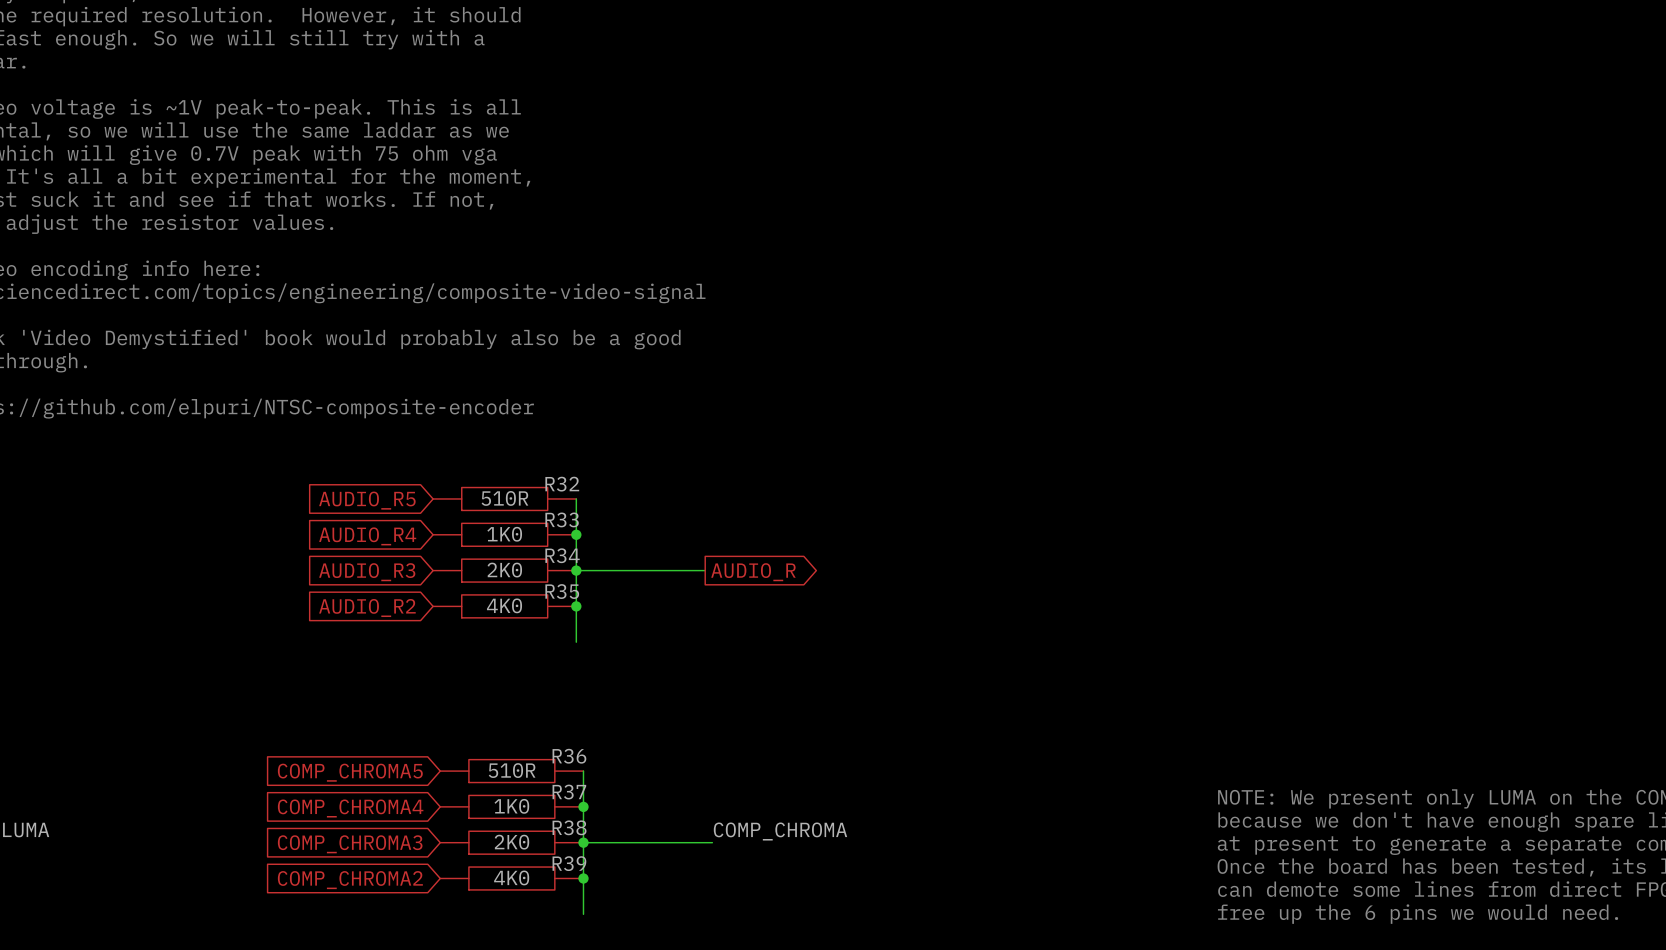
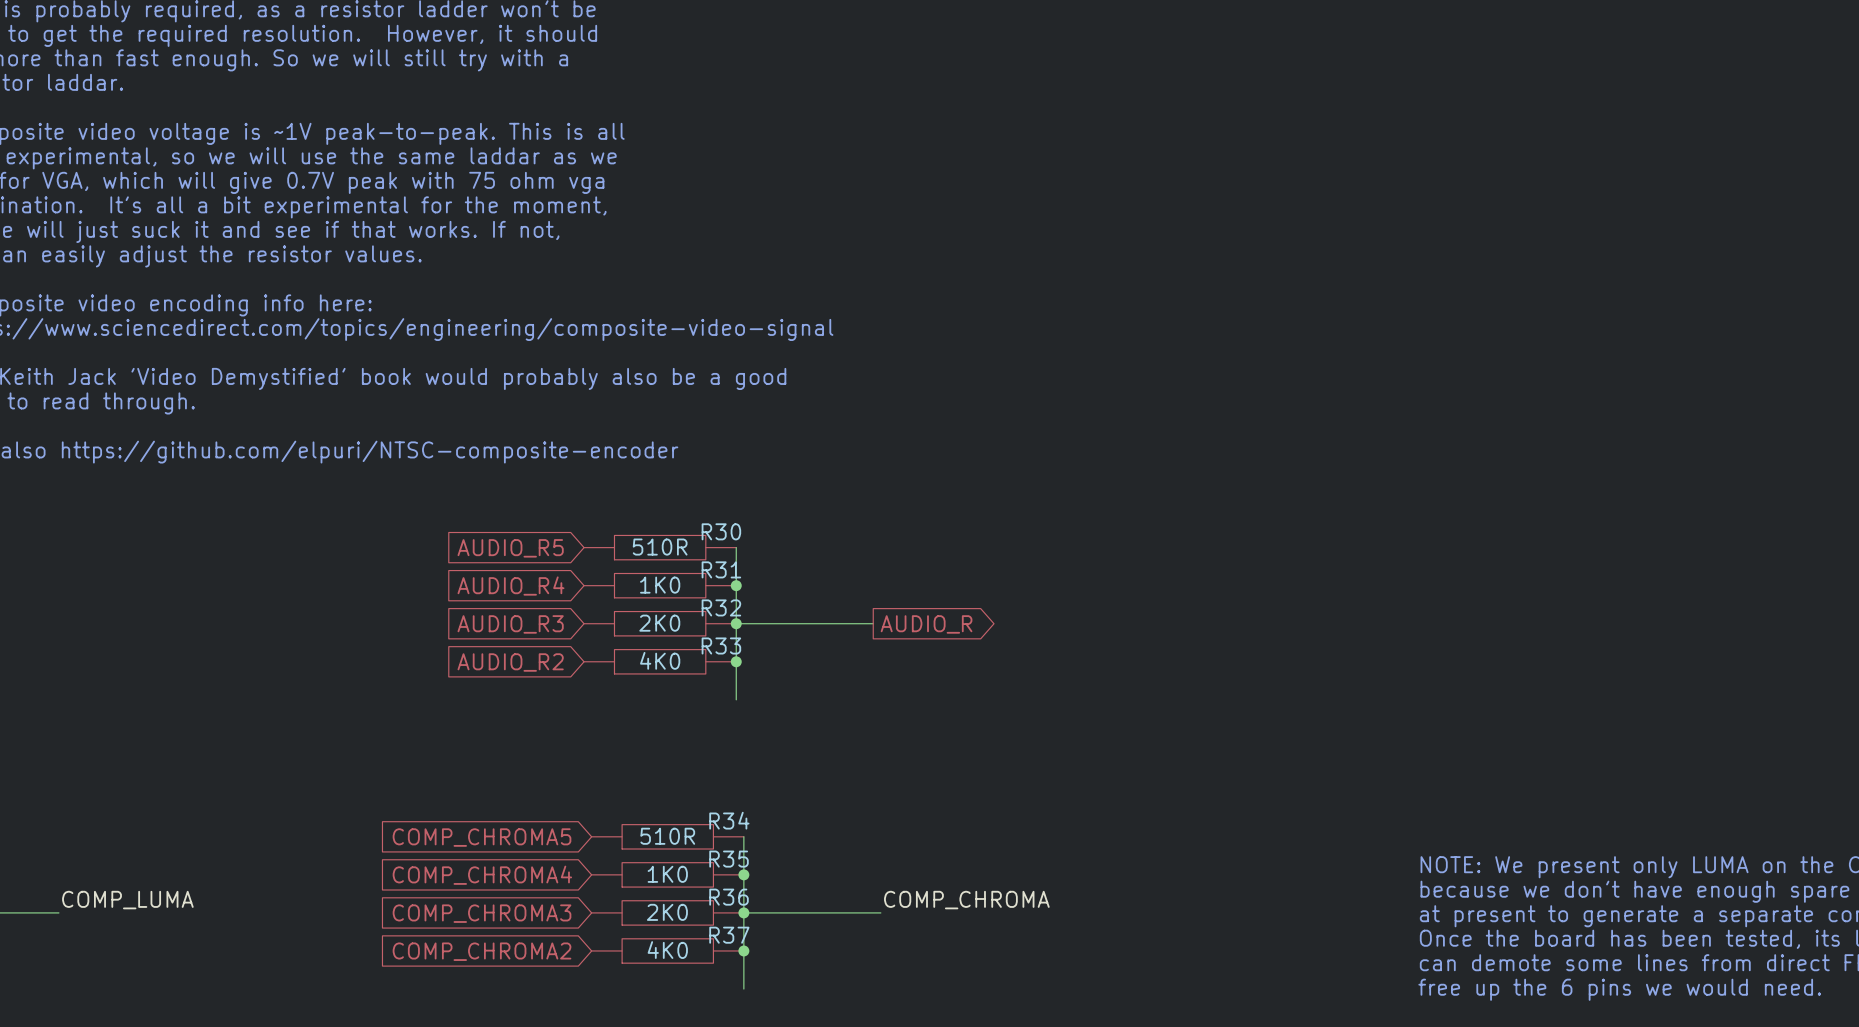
R32 name: R32 (562, 484) -> R30 (721, 531)
R33 name: R33 (562, 519) -> R31 (721, 569)
R34 name: R34 (562, 555) -> R32 (721, 607)
R35 name: R35 (562, 591) -> R33 (721, 645)
R36 name: R36 (569, 756) -> R34 (729, 820)
R37 name: R37 (569, 792) -> R35 (729, 859)
R38 name: R38 (569, 827) -> R36 (729, 897)
R39 name: R39 (569, 863) -> R37 (729, 935)

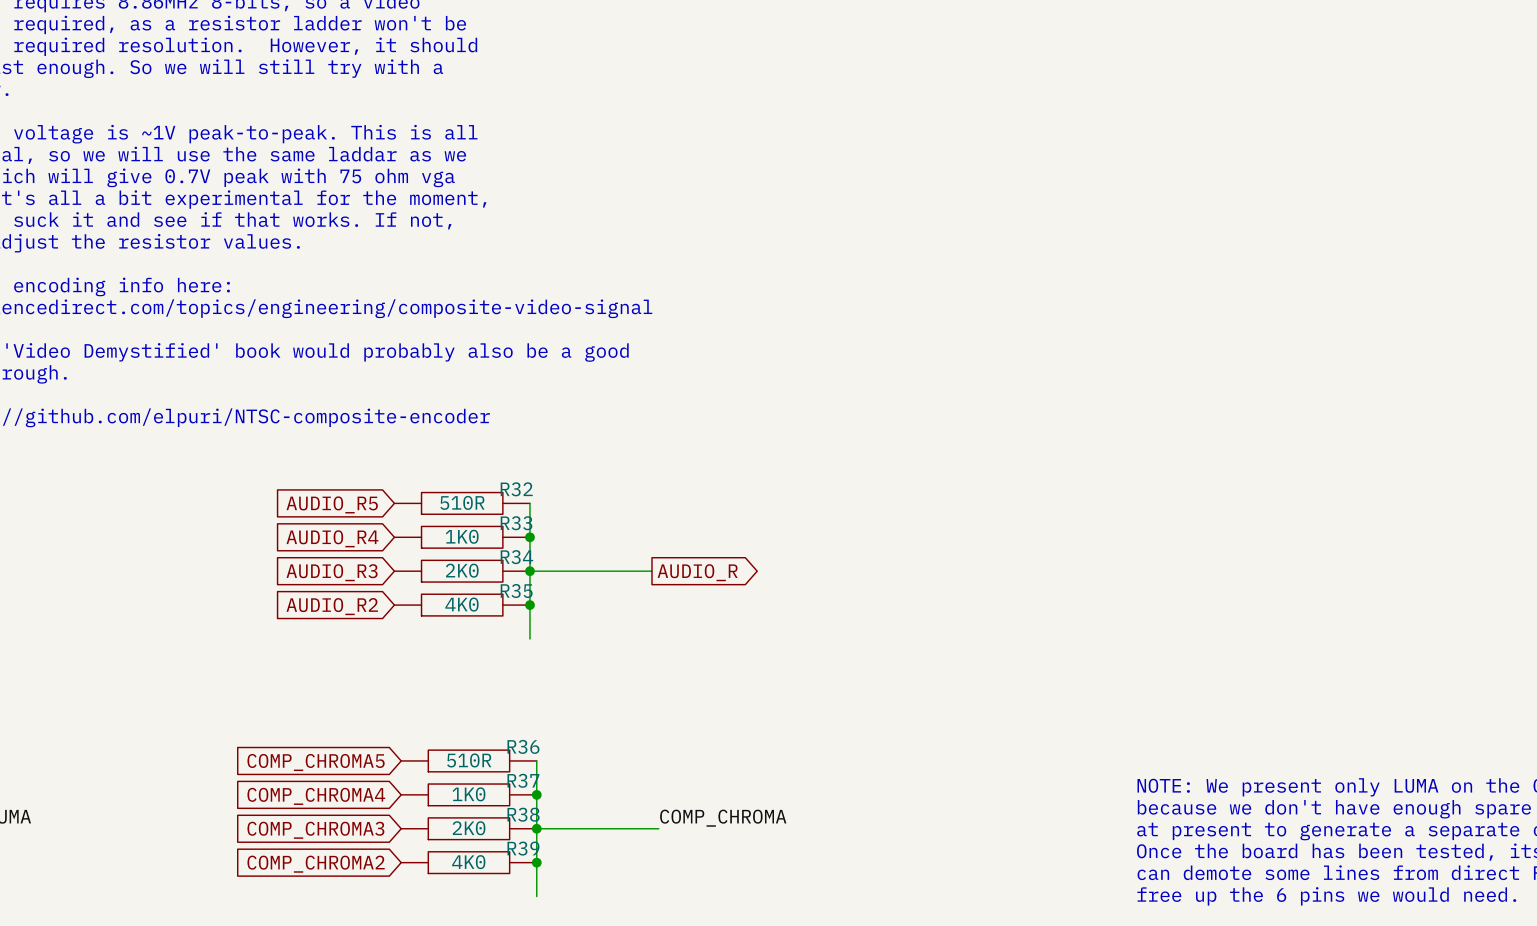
R30 name: R30 (721, 531) -> R32 (516, 489)
R31 name: R31 (721, 569) -> R33 (516, 523)
R32 name: R32 (721, 607) -> R34 (516, 557)
R33 name: R33 (721, 645) -> R35 (516, 591)
R34 name: R34 (729, 820) -> R36 (523, 746)
R35 name: R35 (729, 859) -> R37 (523, 780)
R36 name: R36 (729, 897) -> R38 (523, 814)
R37 name: R37 (729, 935) -> R39 (523, 848)

